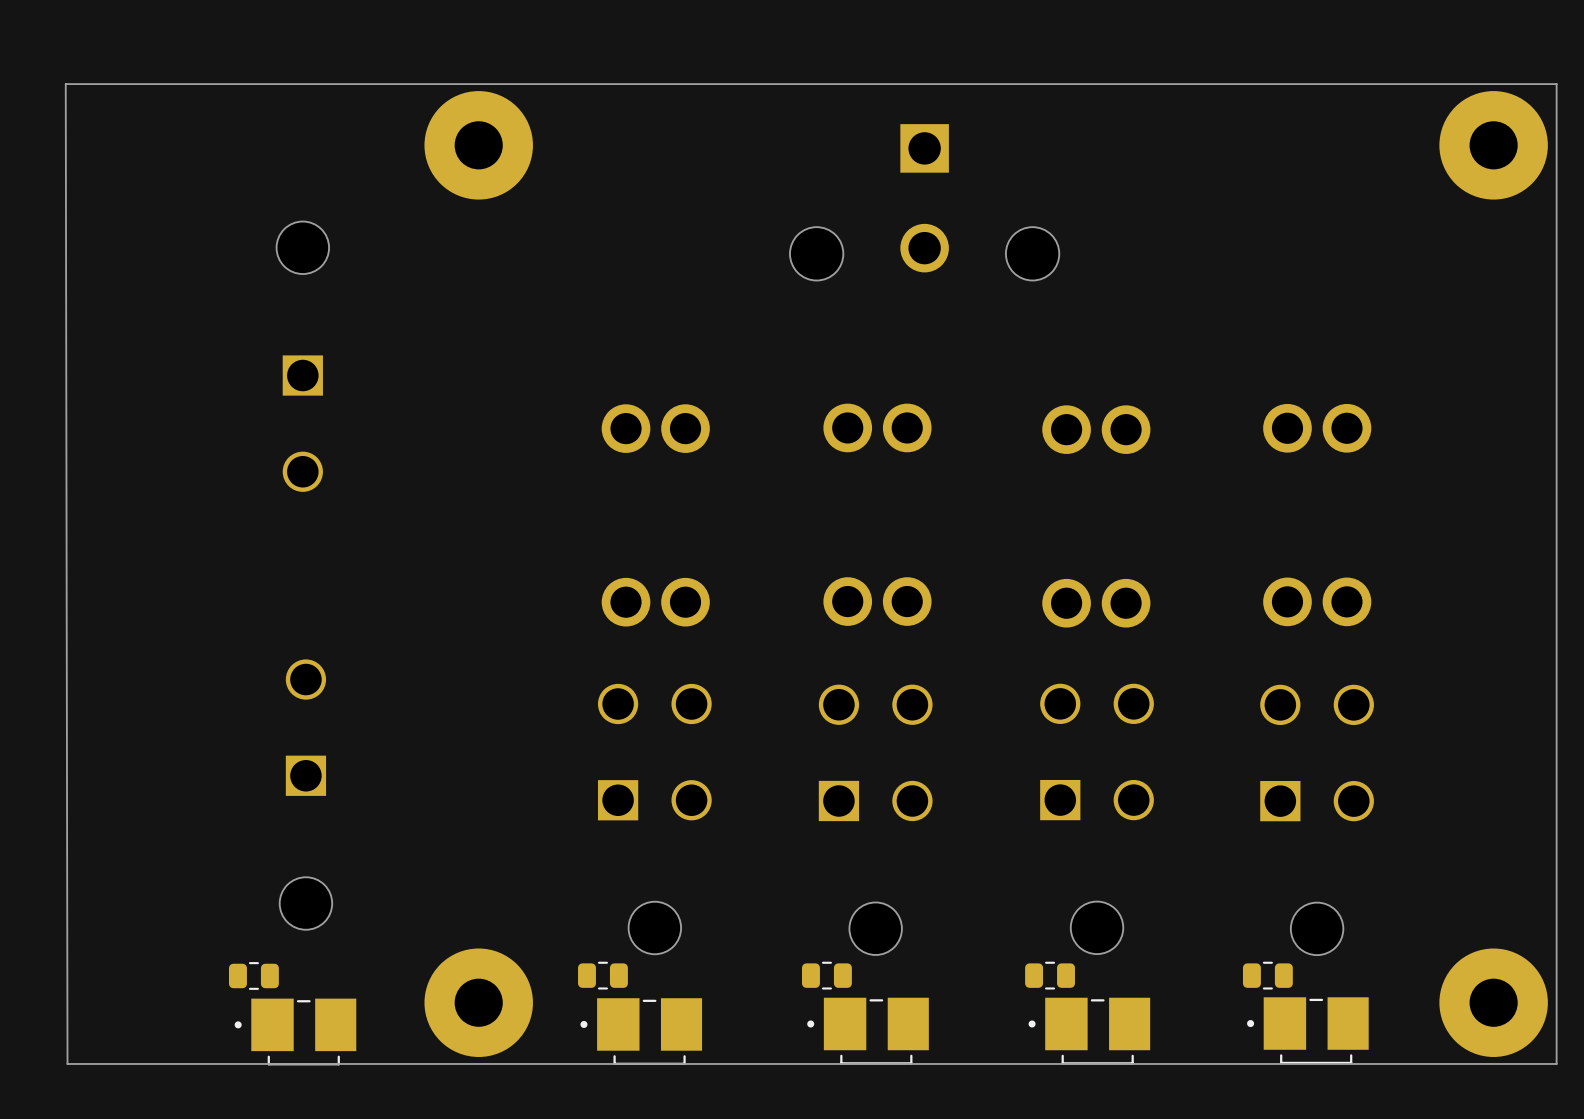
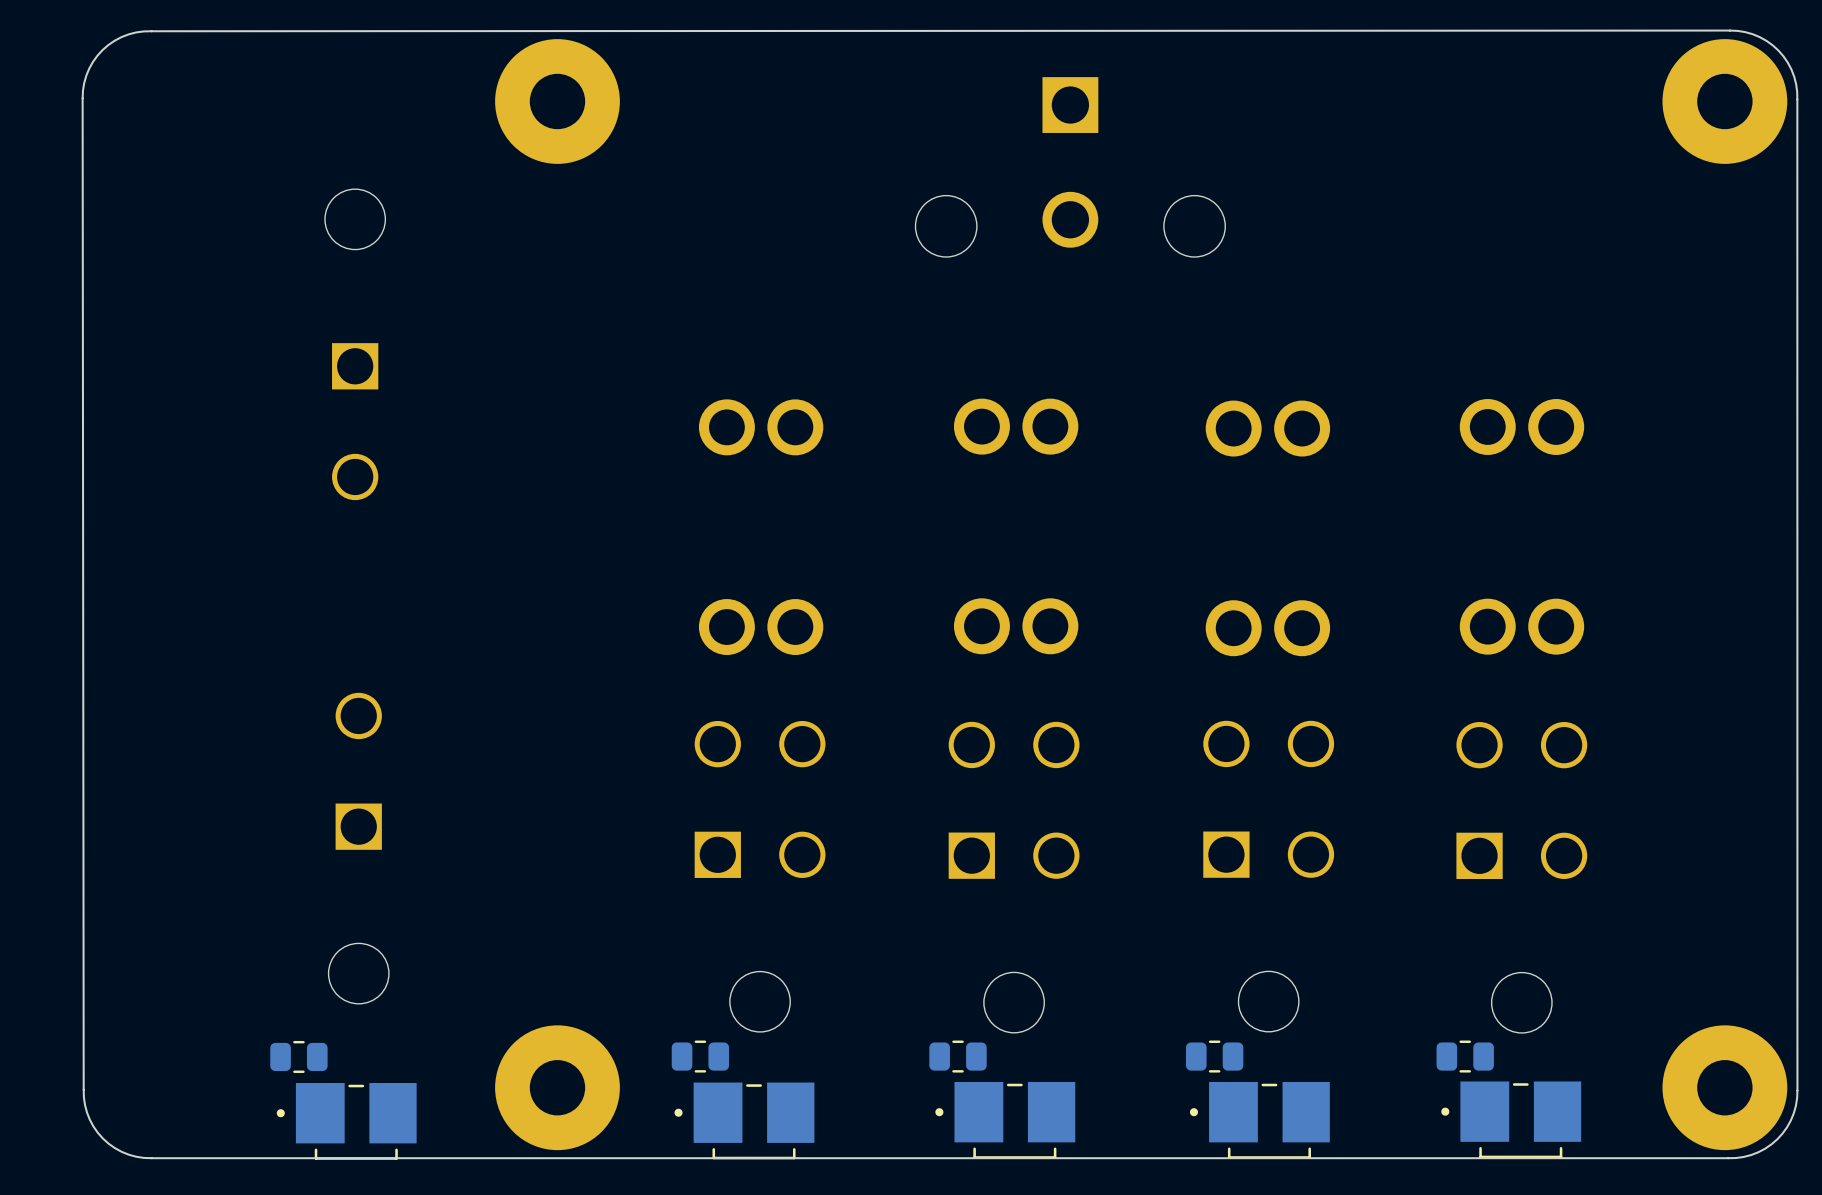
board edge: (1496, 1063) (1556, 1063) (1556, 84) (65, 84) (67, 1063) (125, 1063) -> (1728, 1158) (1743, 1156) (1758, 1152) (1777, 1139) (1790, 1120) (1795, 1105) (1797, 1090) (1797, 91) (1791, 69) (1783, 56) (1772, 45) (1752, 34) (1729, 30) (151, 31) (128, 34) (108, 44) (97, 55) (89, 68) (84, 83) (82, 98) (83, 1097) (89, 1119) (102, 1138) (121, 1151) (136, 1156) (151, 1158)

